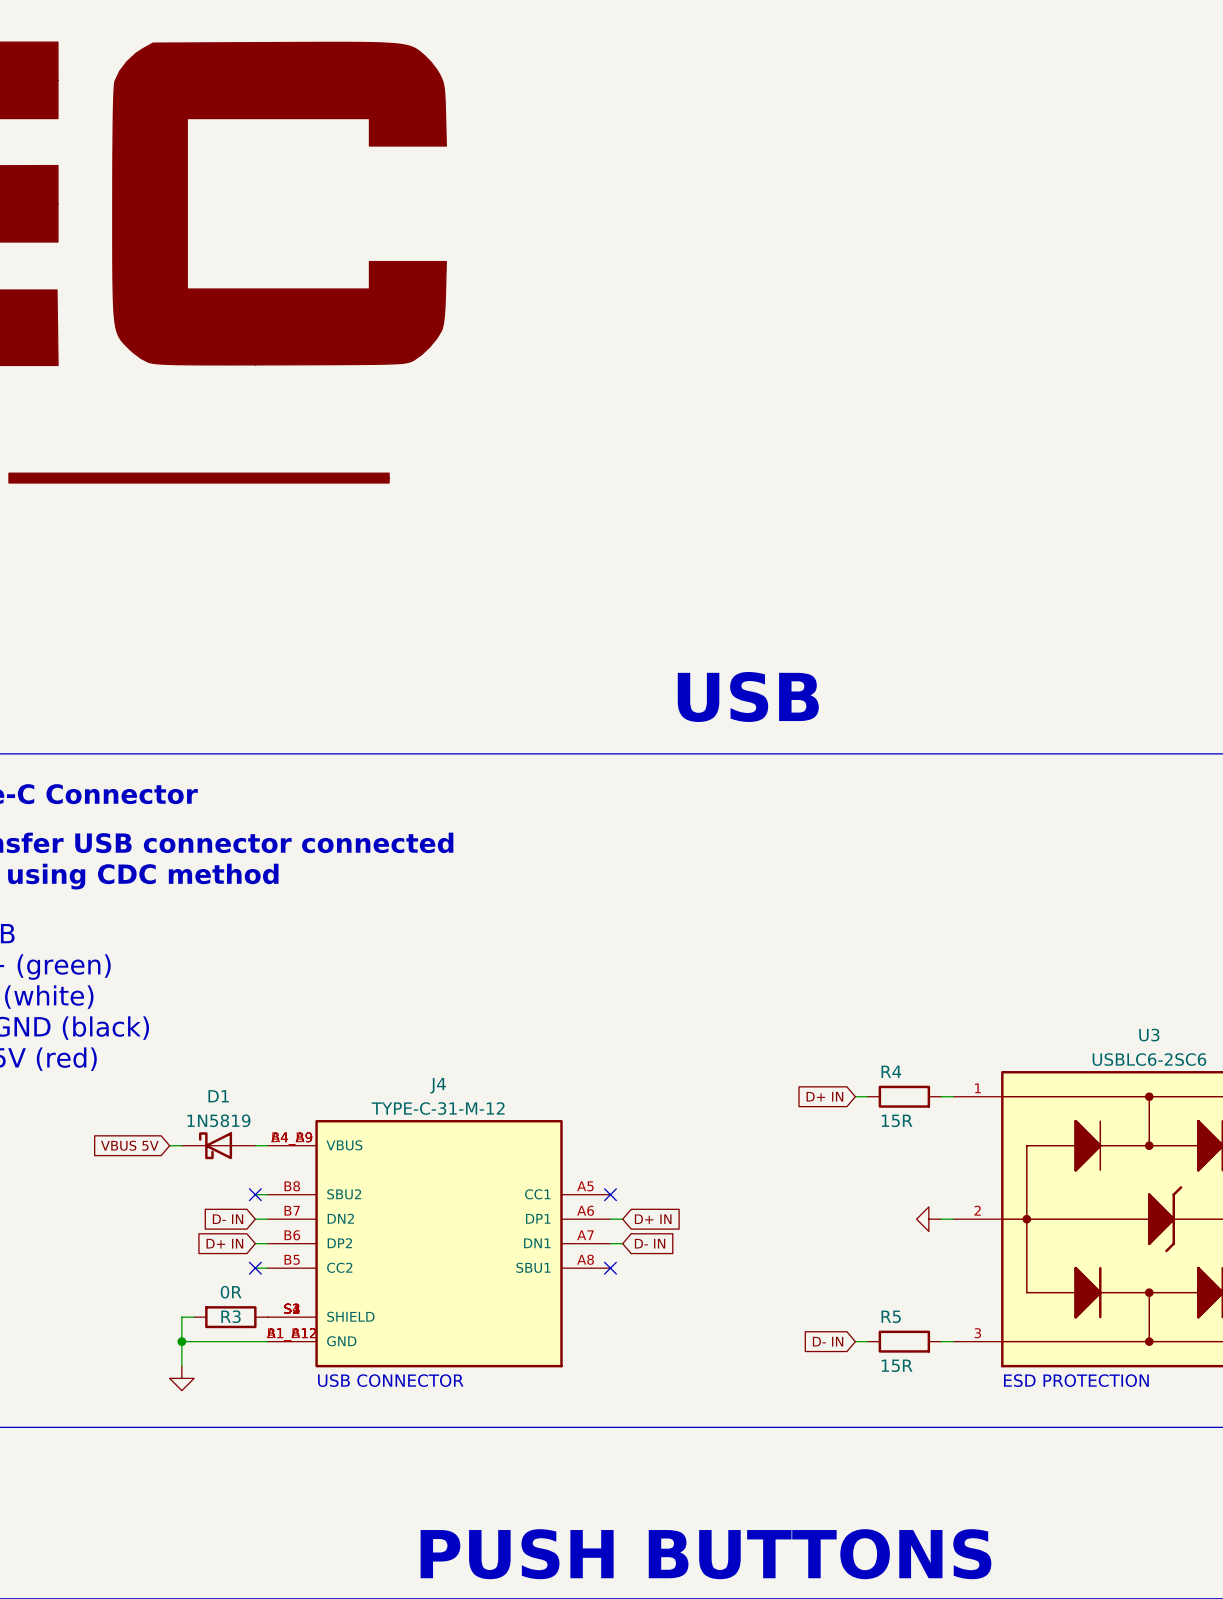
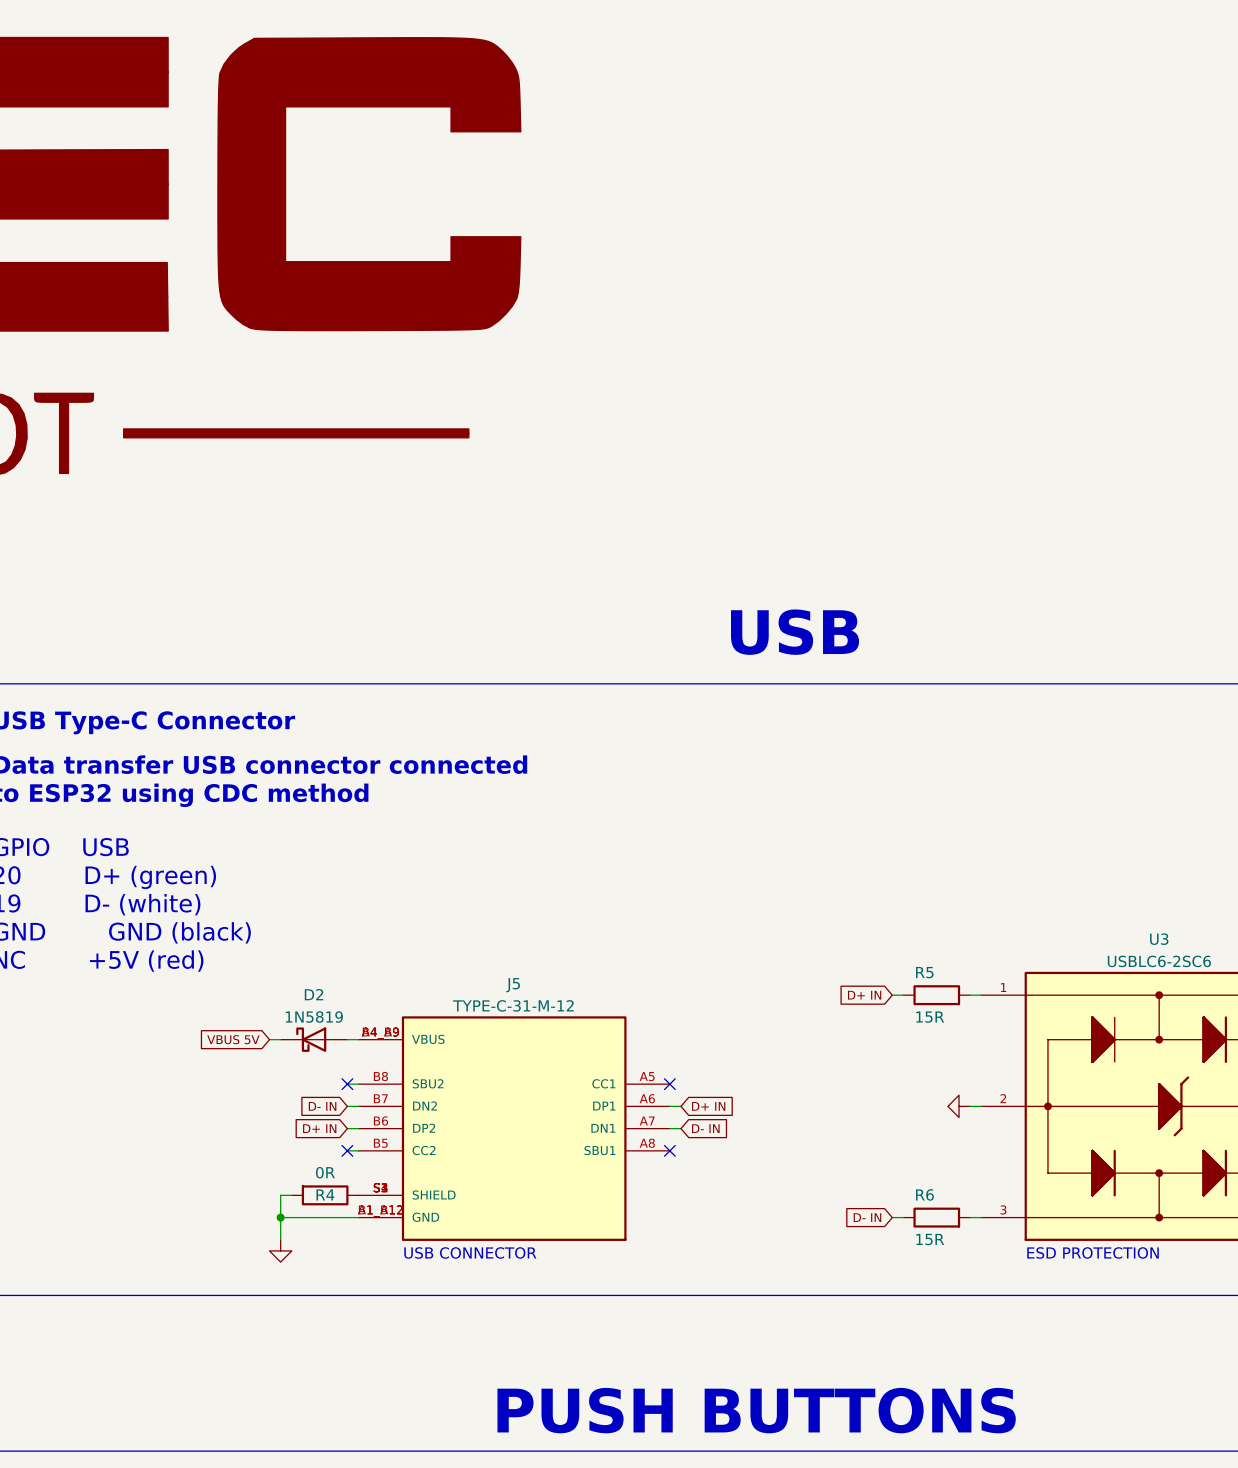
R4 name: R4 (891, 1071) -> R5 (924, 972)
J4 name: J4 (438, 1085) -> J5 (513, 985)
D1 name: D1 (218, 1096) -> D2 (314, 994)
R3 name: R3 (231, 1316) -> R4 (325, 1194)
R5 name: R5 (891, 1316) -> R6 (924, 1194)

